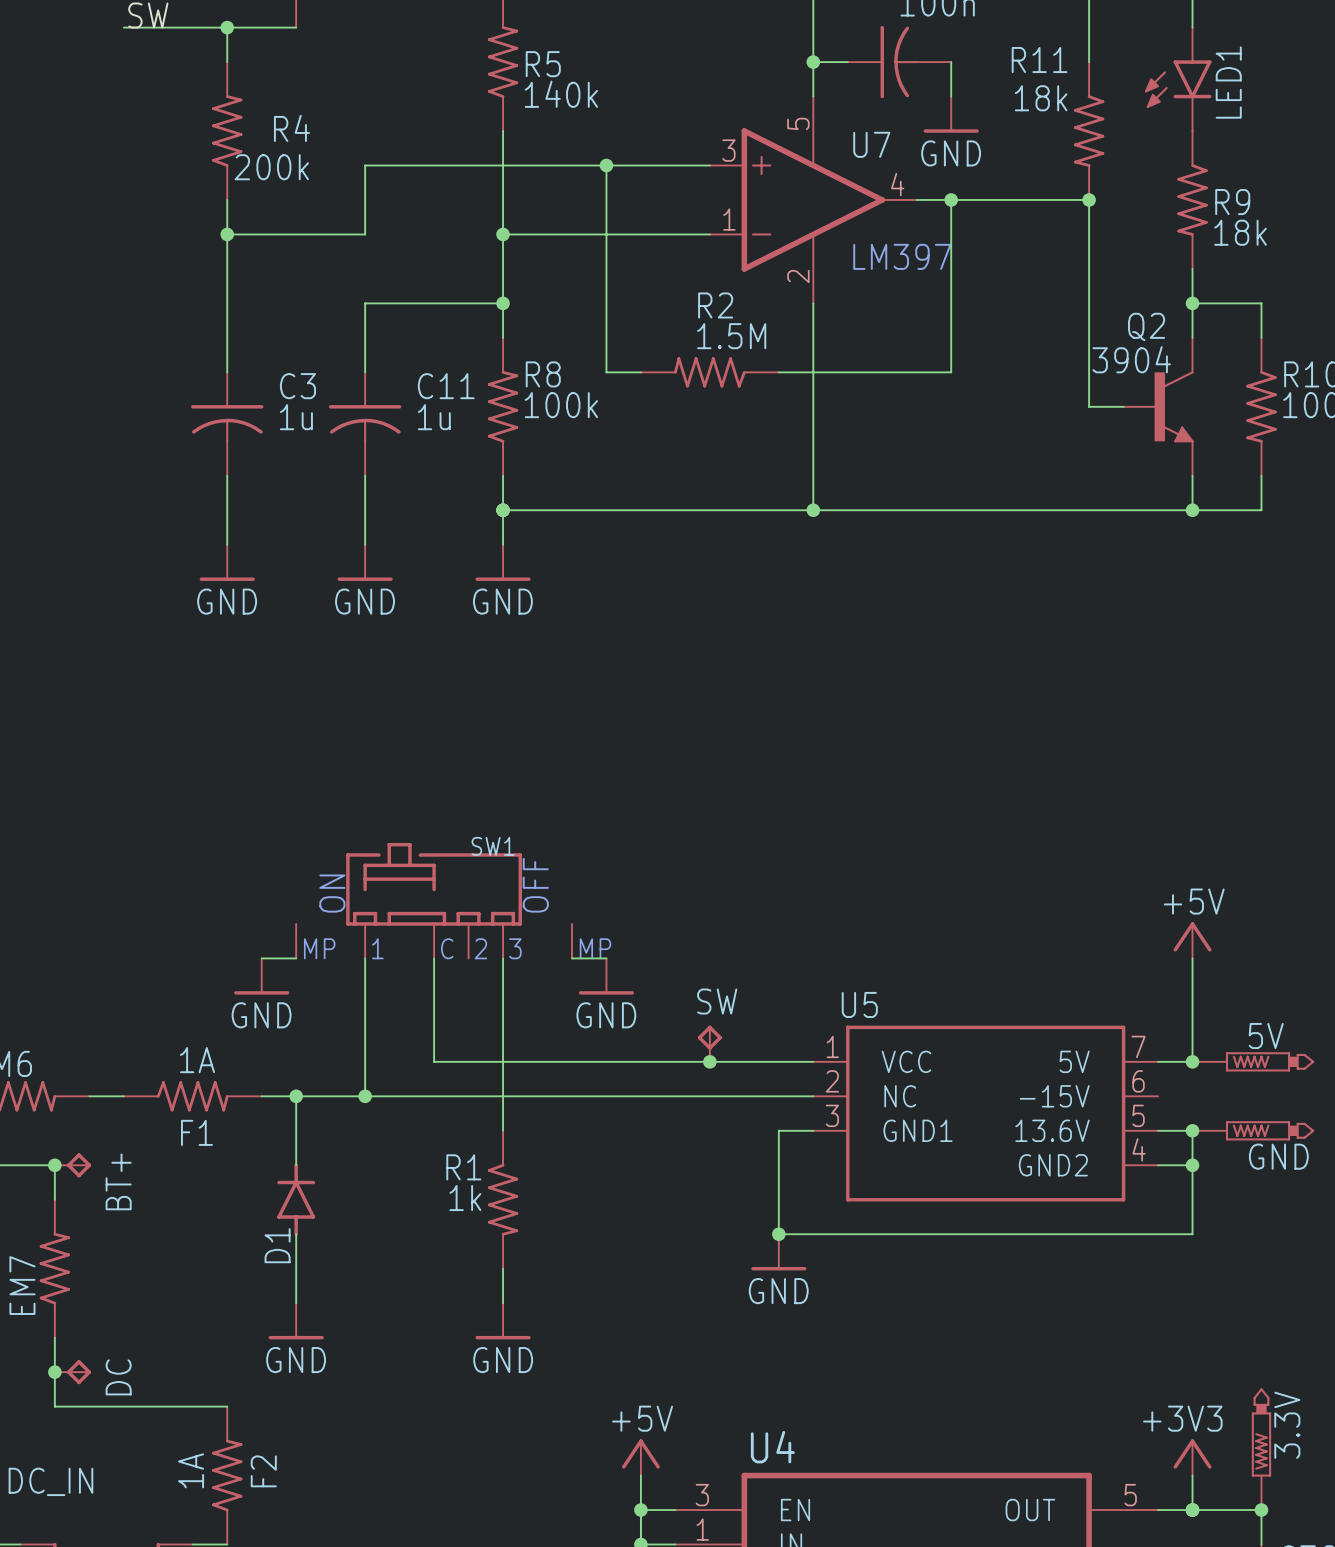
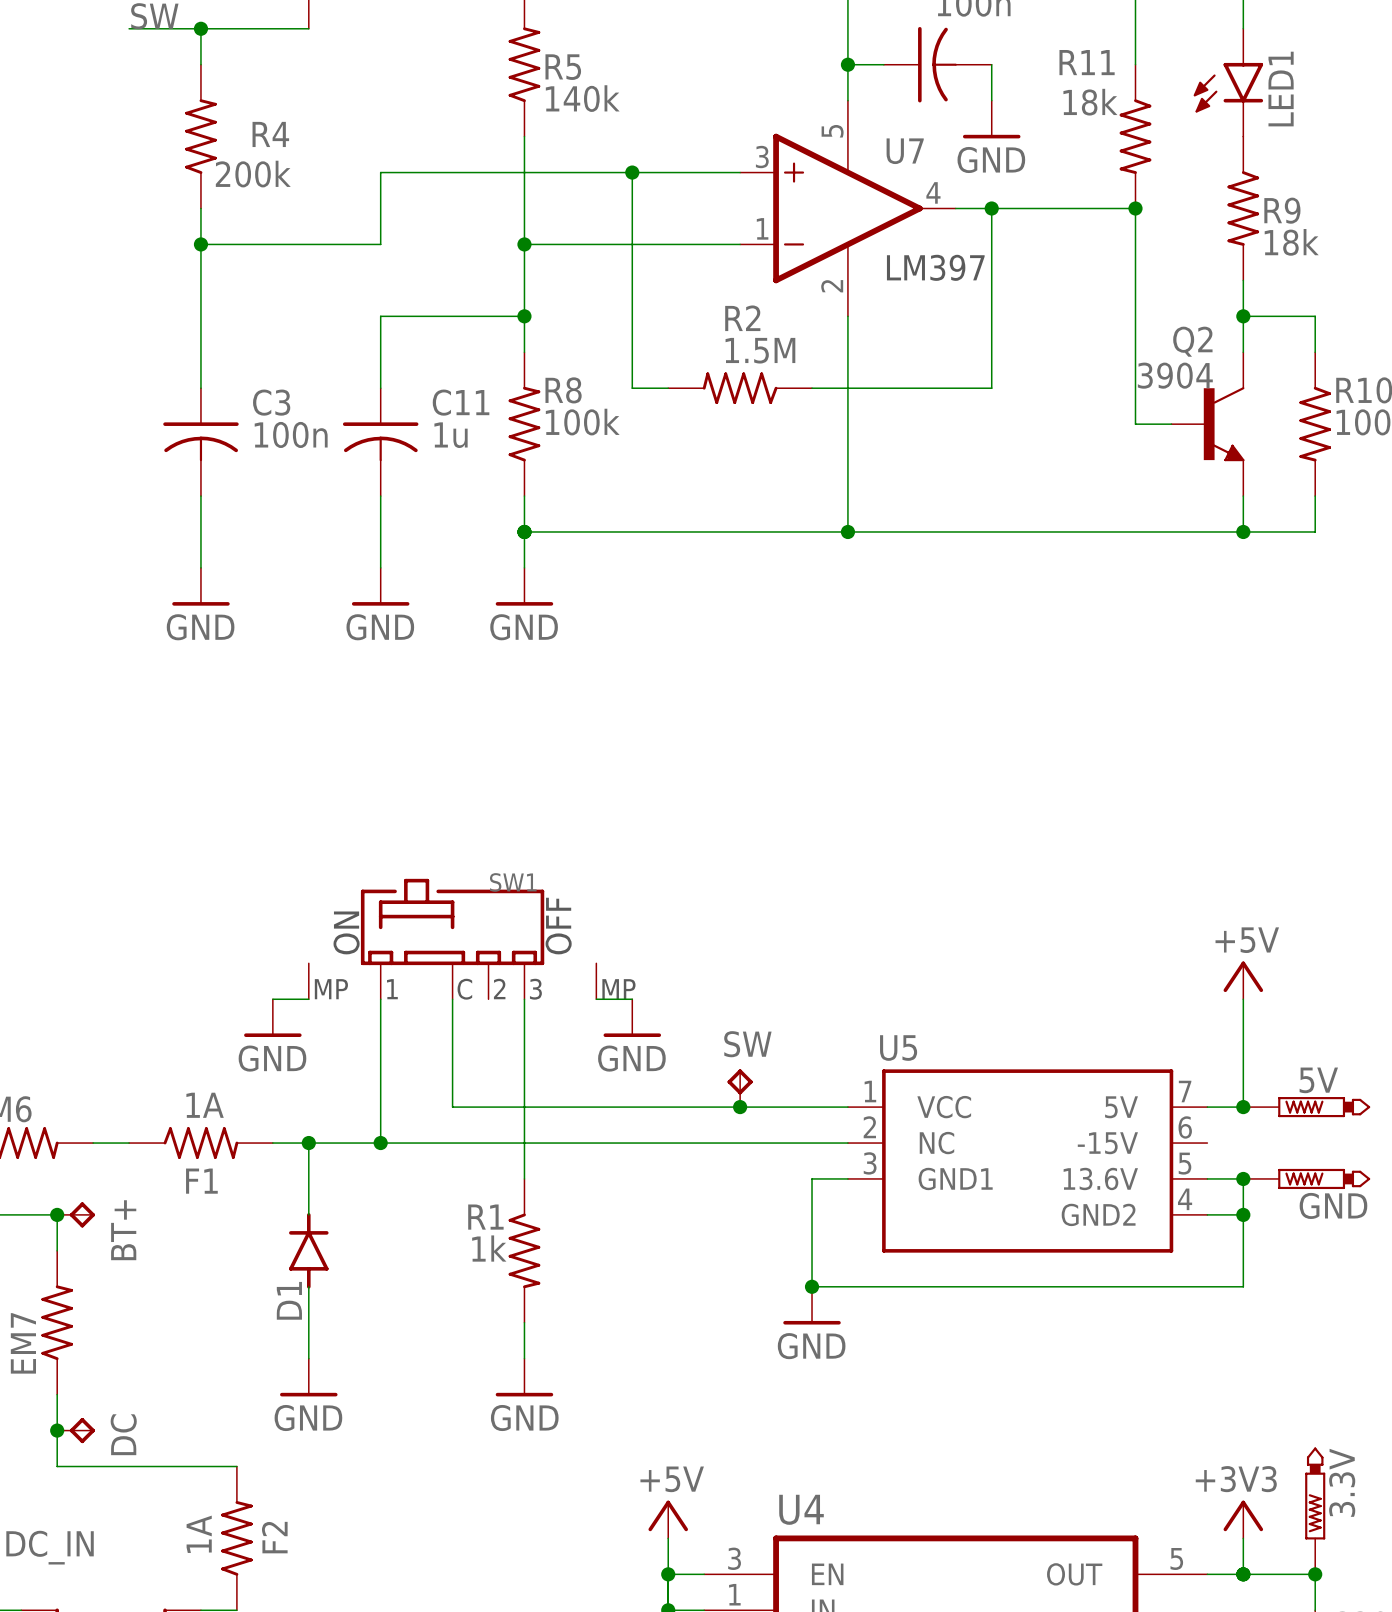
wire: (227, 27) (227, 62) -> (200, 28) (200, 64)
junction position: (227, 27) -> (200, 28)
R4 position: (227, 131) -> (200, 136)
wire: (227, 199) (227, 372) -> (200, 208) (200, 388)
wire: none -> (200, 244) (236, 244)
junction position: (227, 234) -> (200, 244)
C3 value: 1u (296, 417) -> 100n (291, 434)
C3 position: (227, 424) -> (200, 442)
wire: (227, 475) (227, 544) -> (200, 496) (200, 567)
power symbol position: GND (227, 562) -> GND (200, 586)

